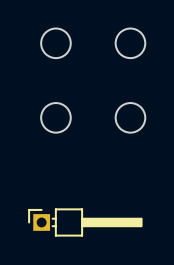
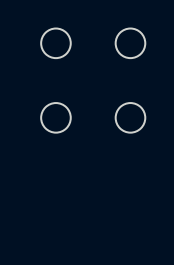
part: (85, 222) -> none

